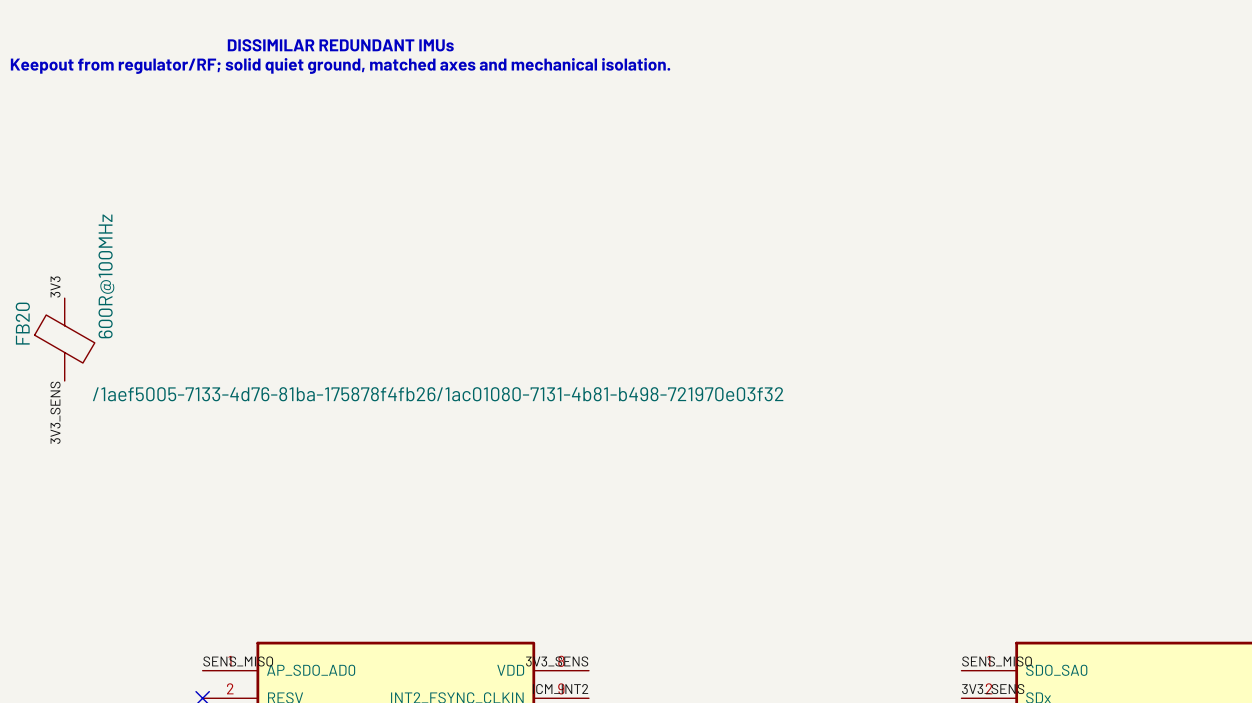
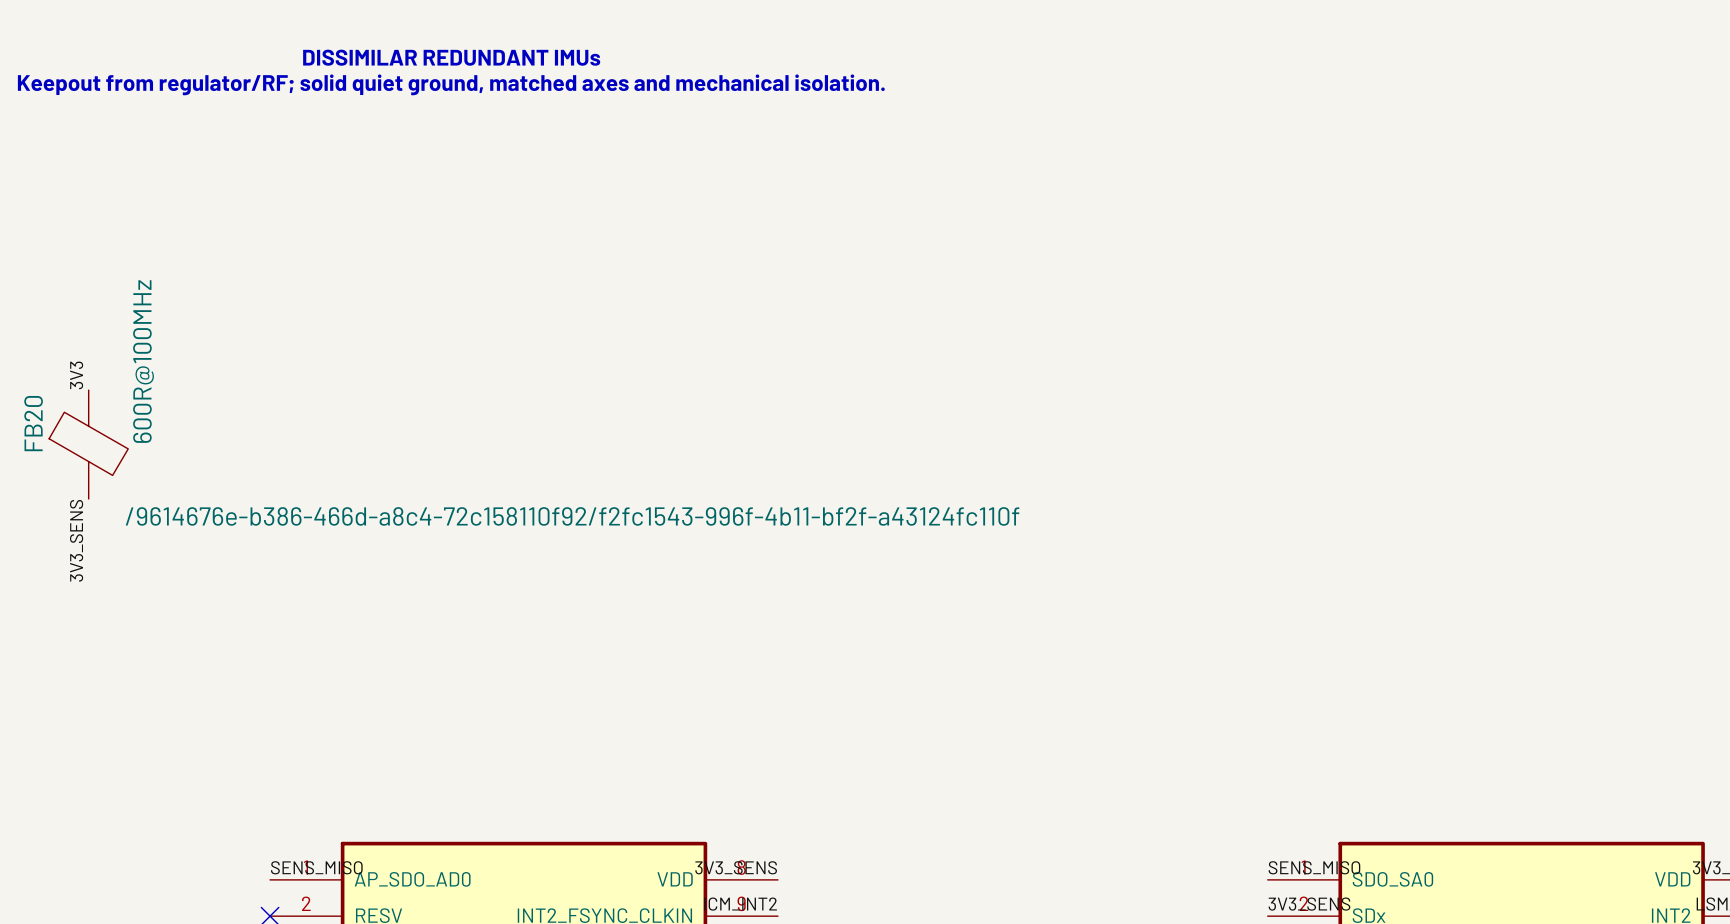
FB20 text: /1aef5005-7133-4d76-81ba-175878f4fb26/1ac01080-7131-4b81-b498-721970e03f32 (438, 394) -> /9614676e-b386-466d-a8c4-72c158110f92/f2fc1543-996f-4b11-bf2f-a43124fc110f (572, 516)

